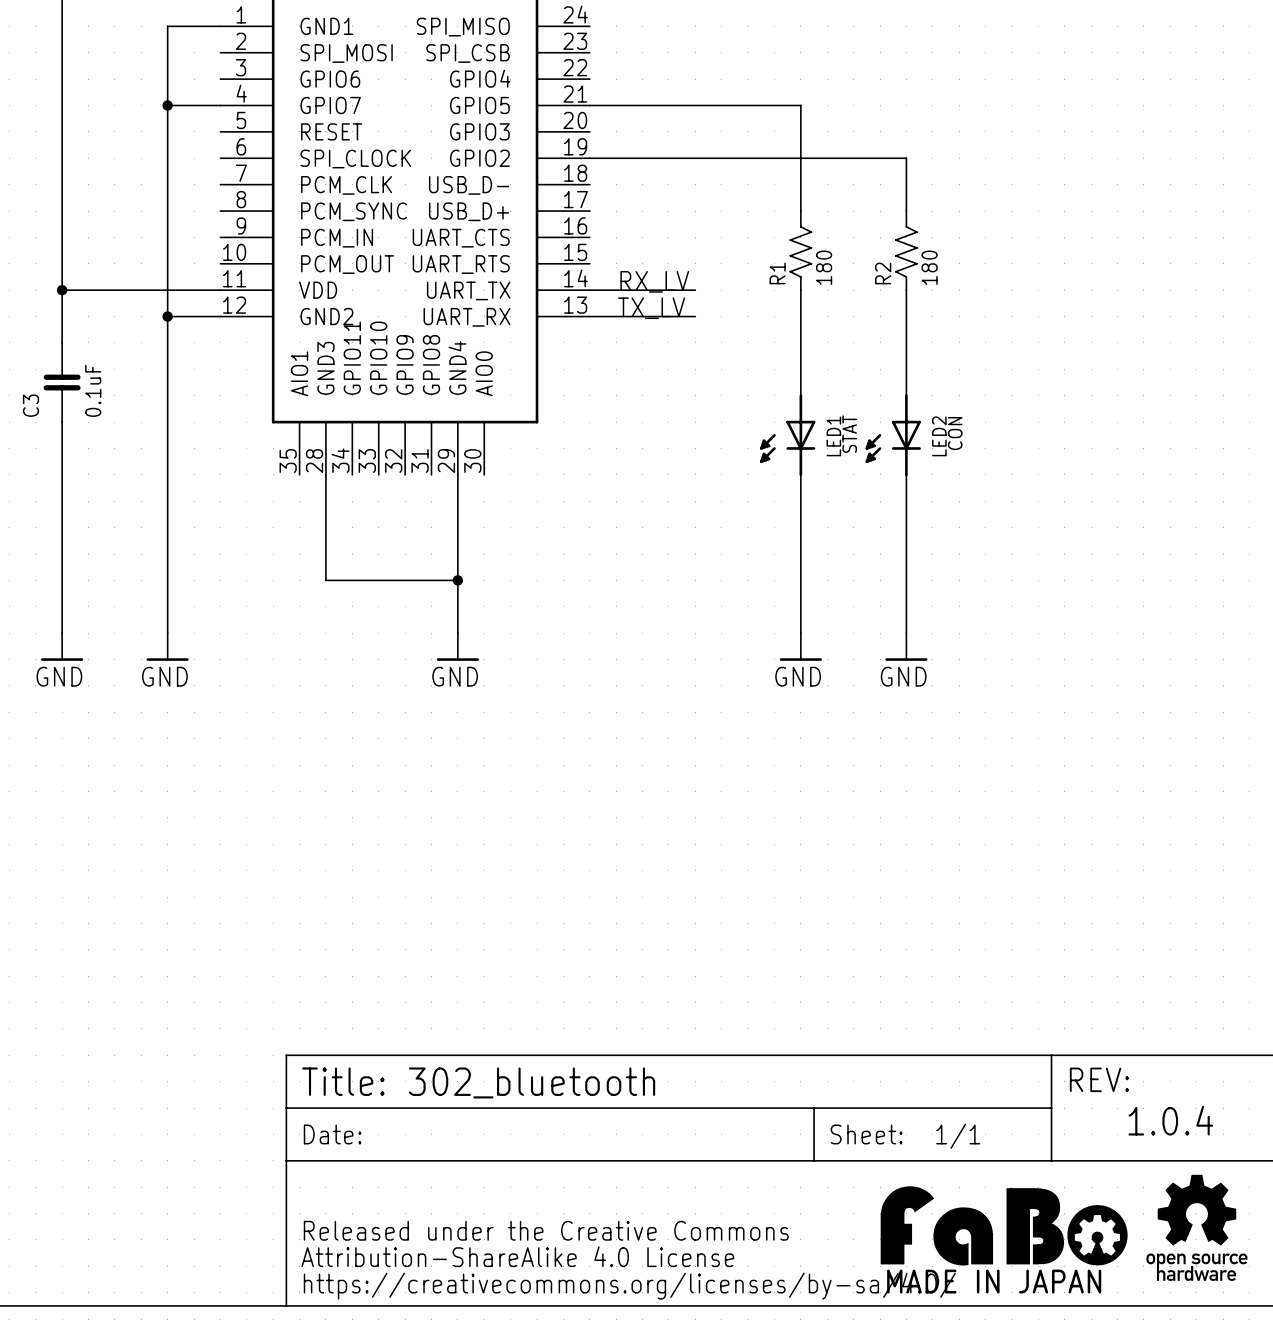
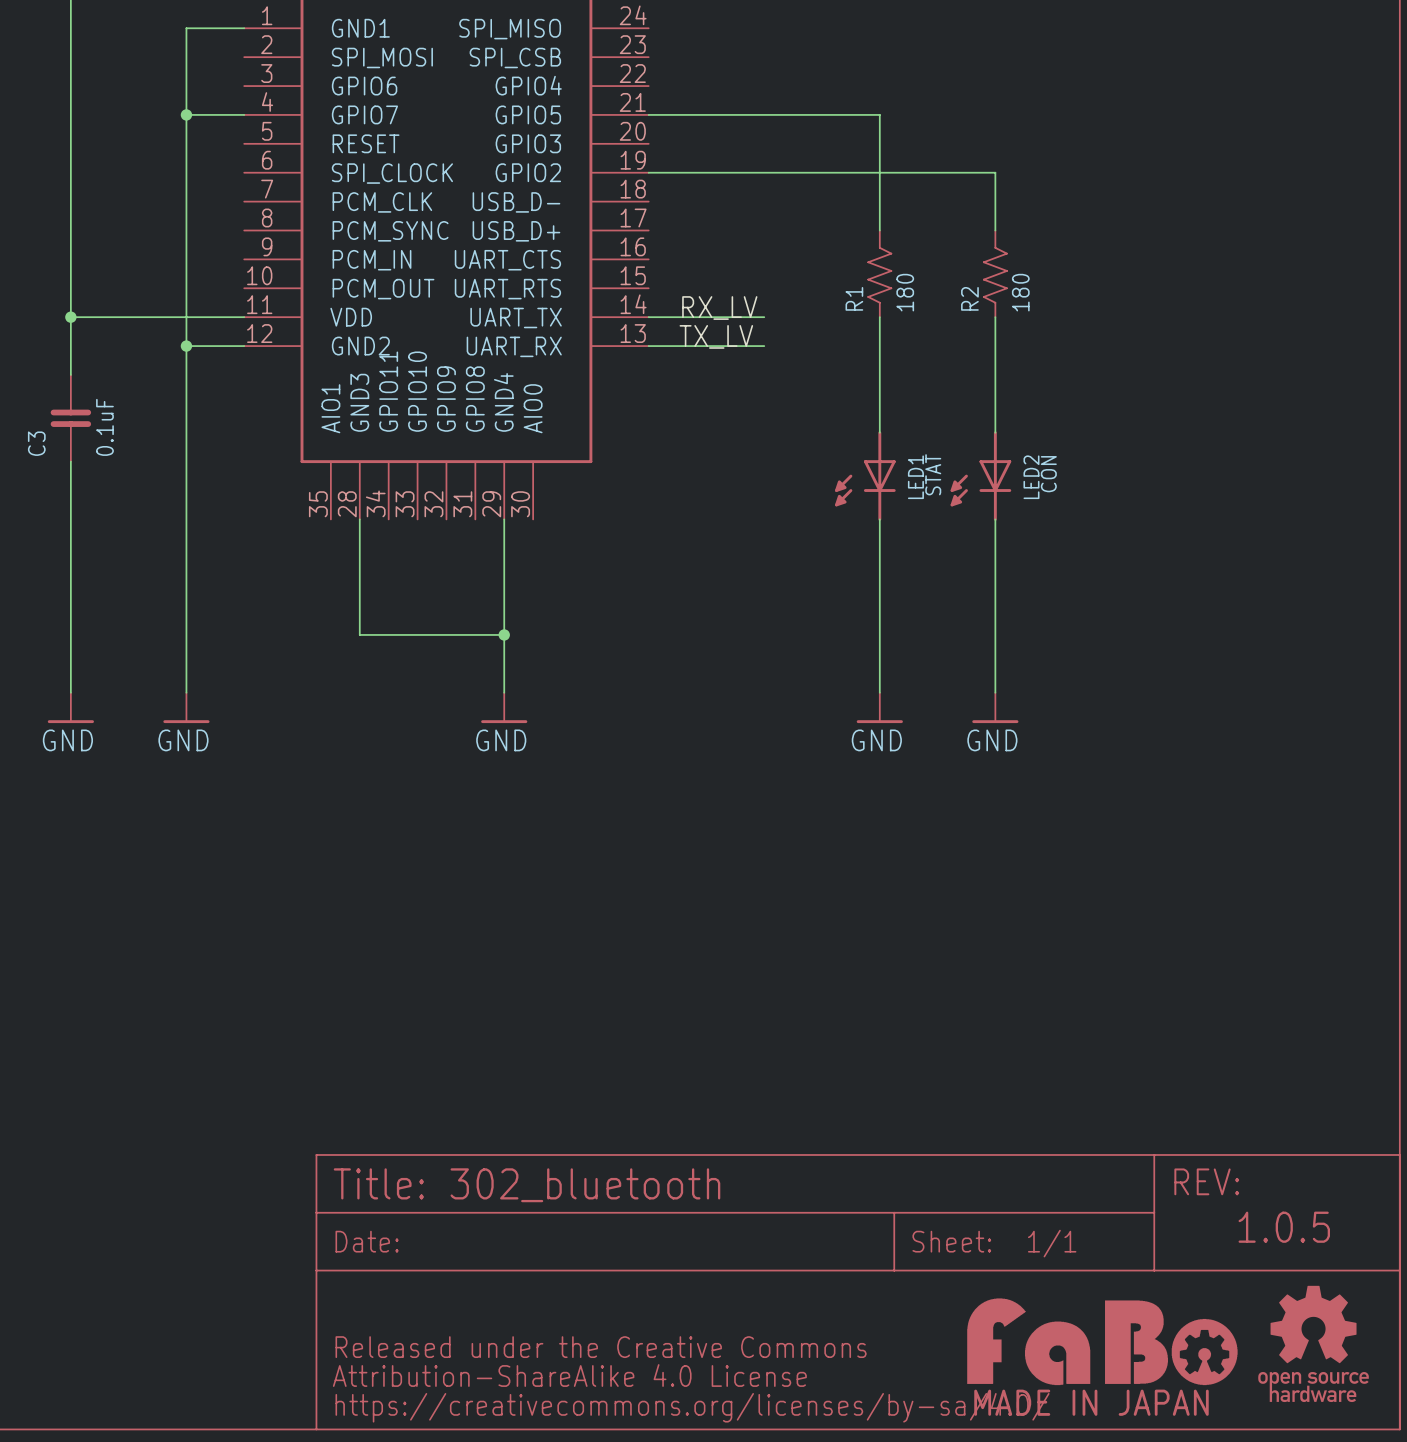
text: 1.0.4 (1170, 1120) -> 1.0.5 (1284, 1227)

